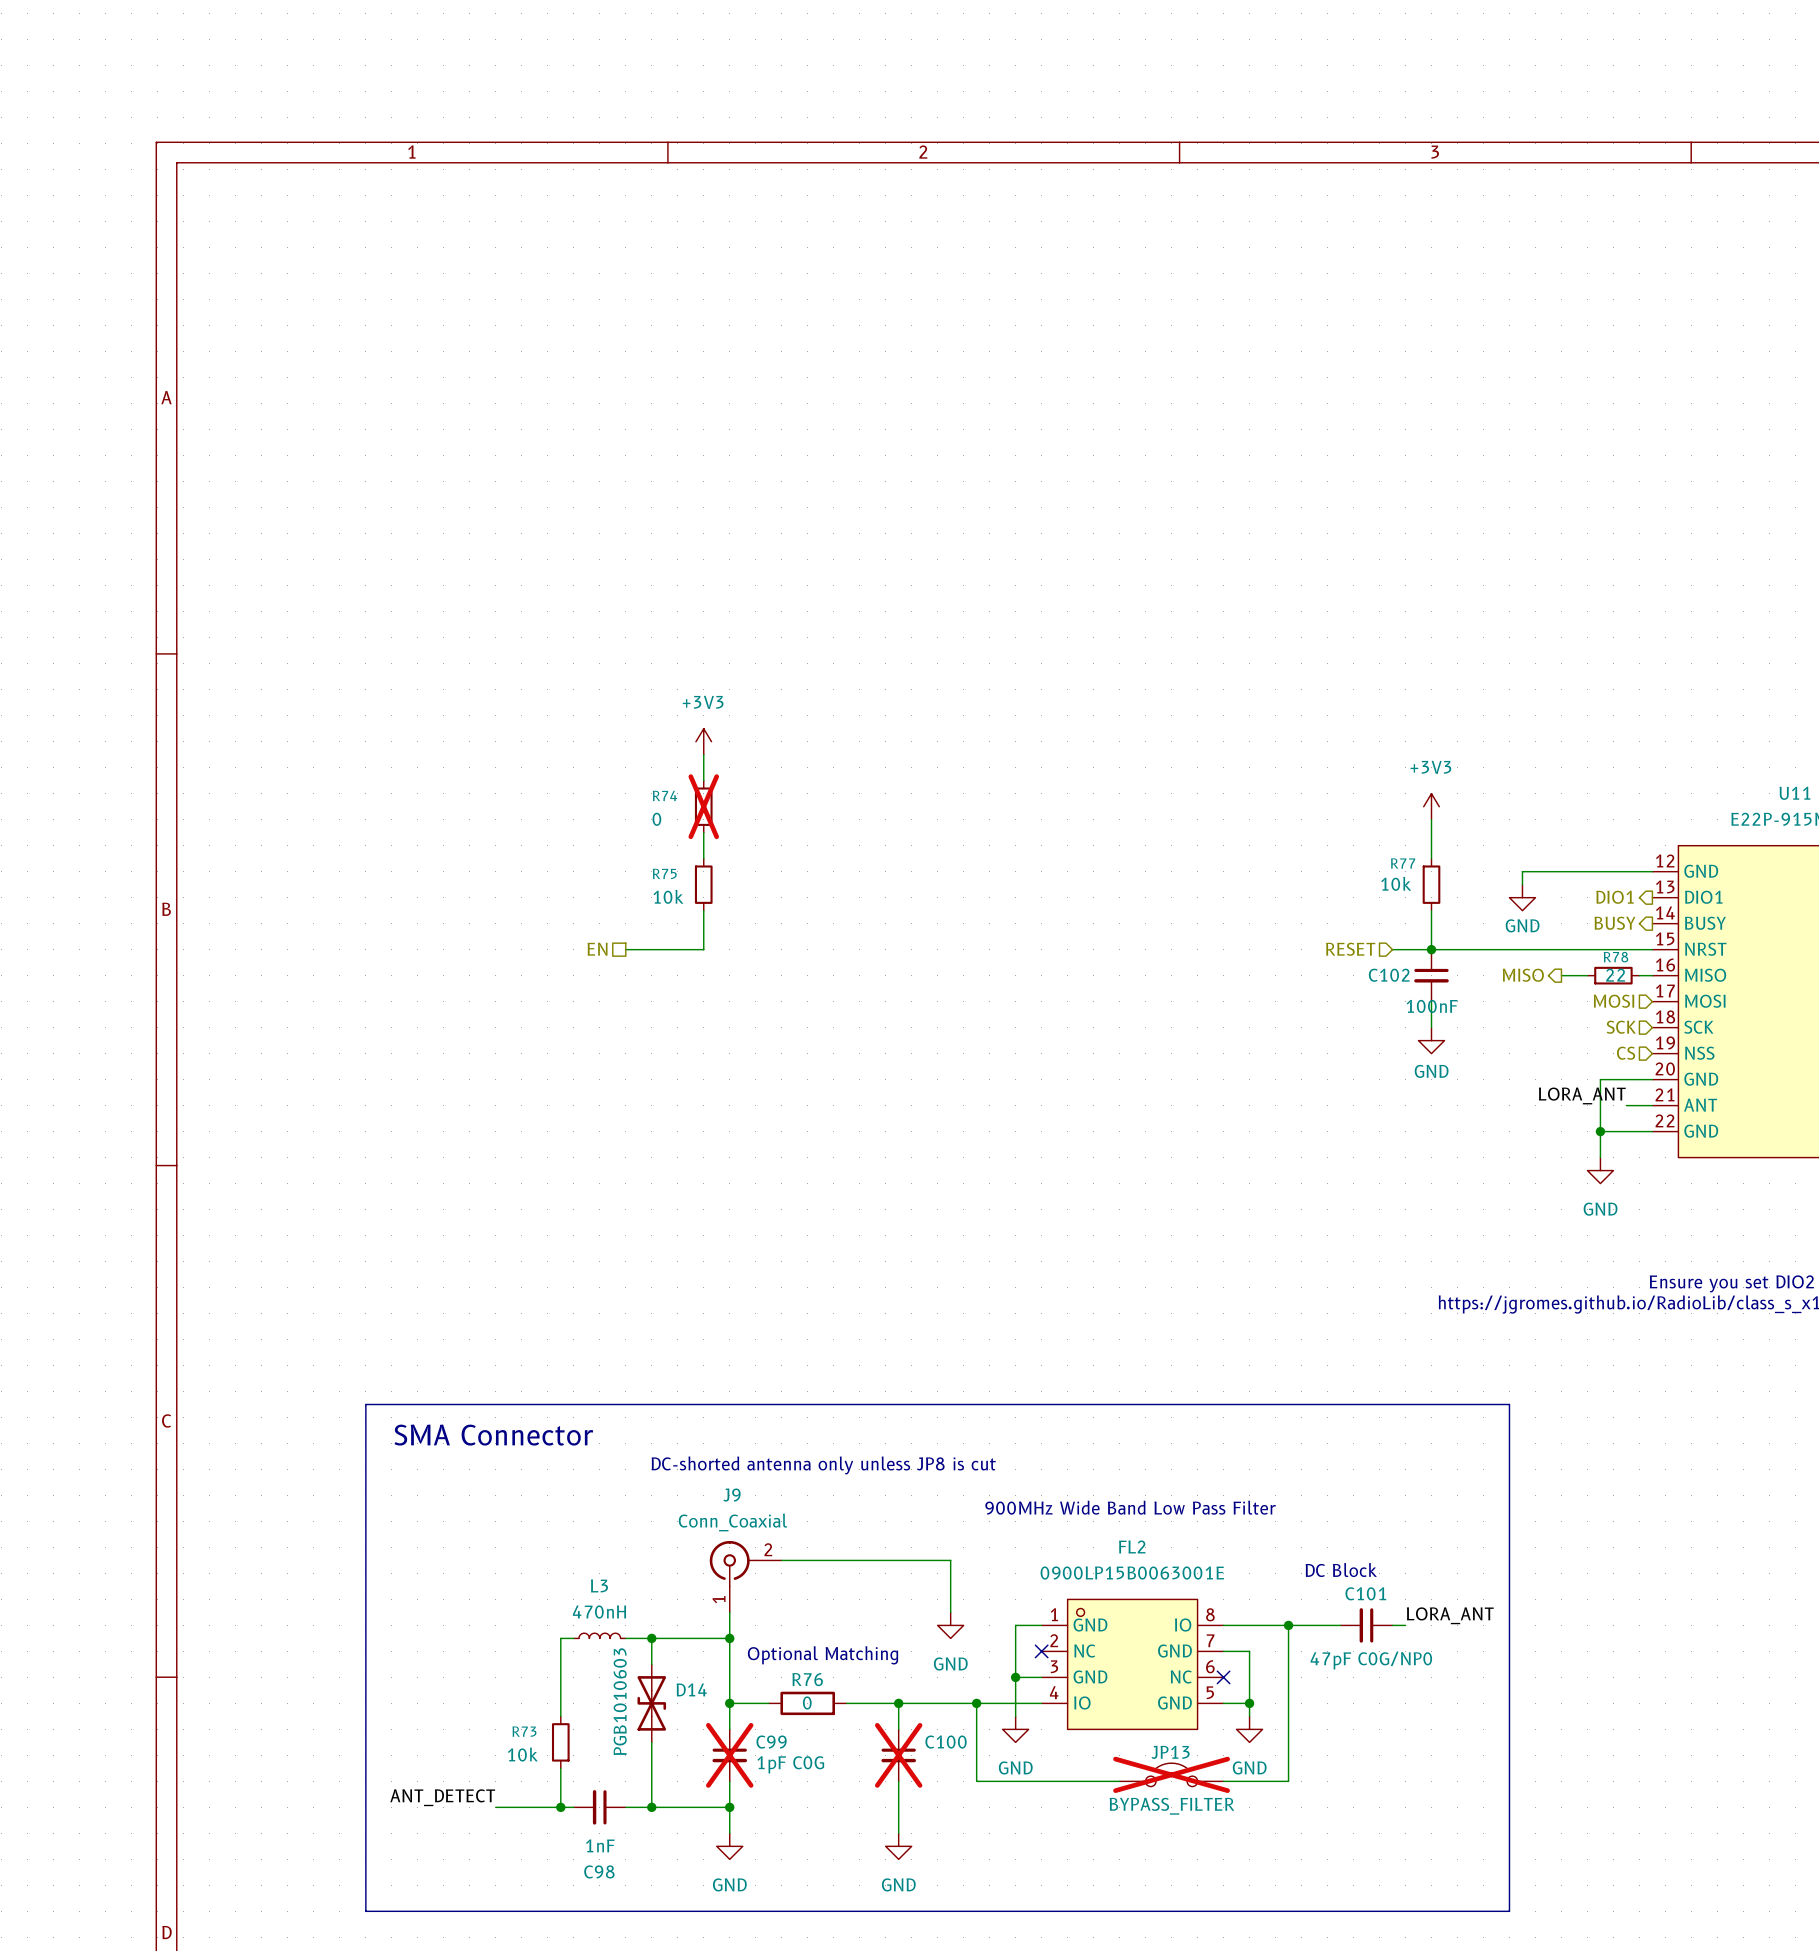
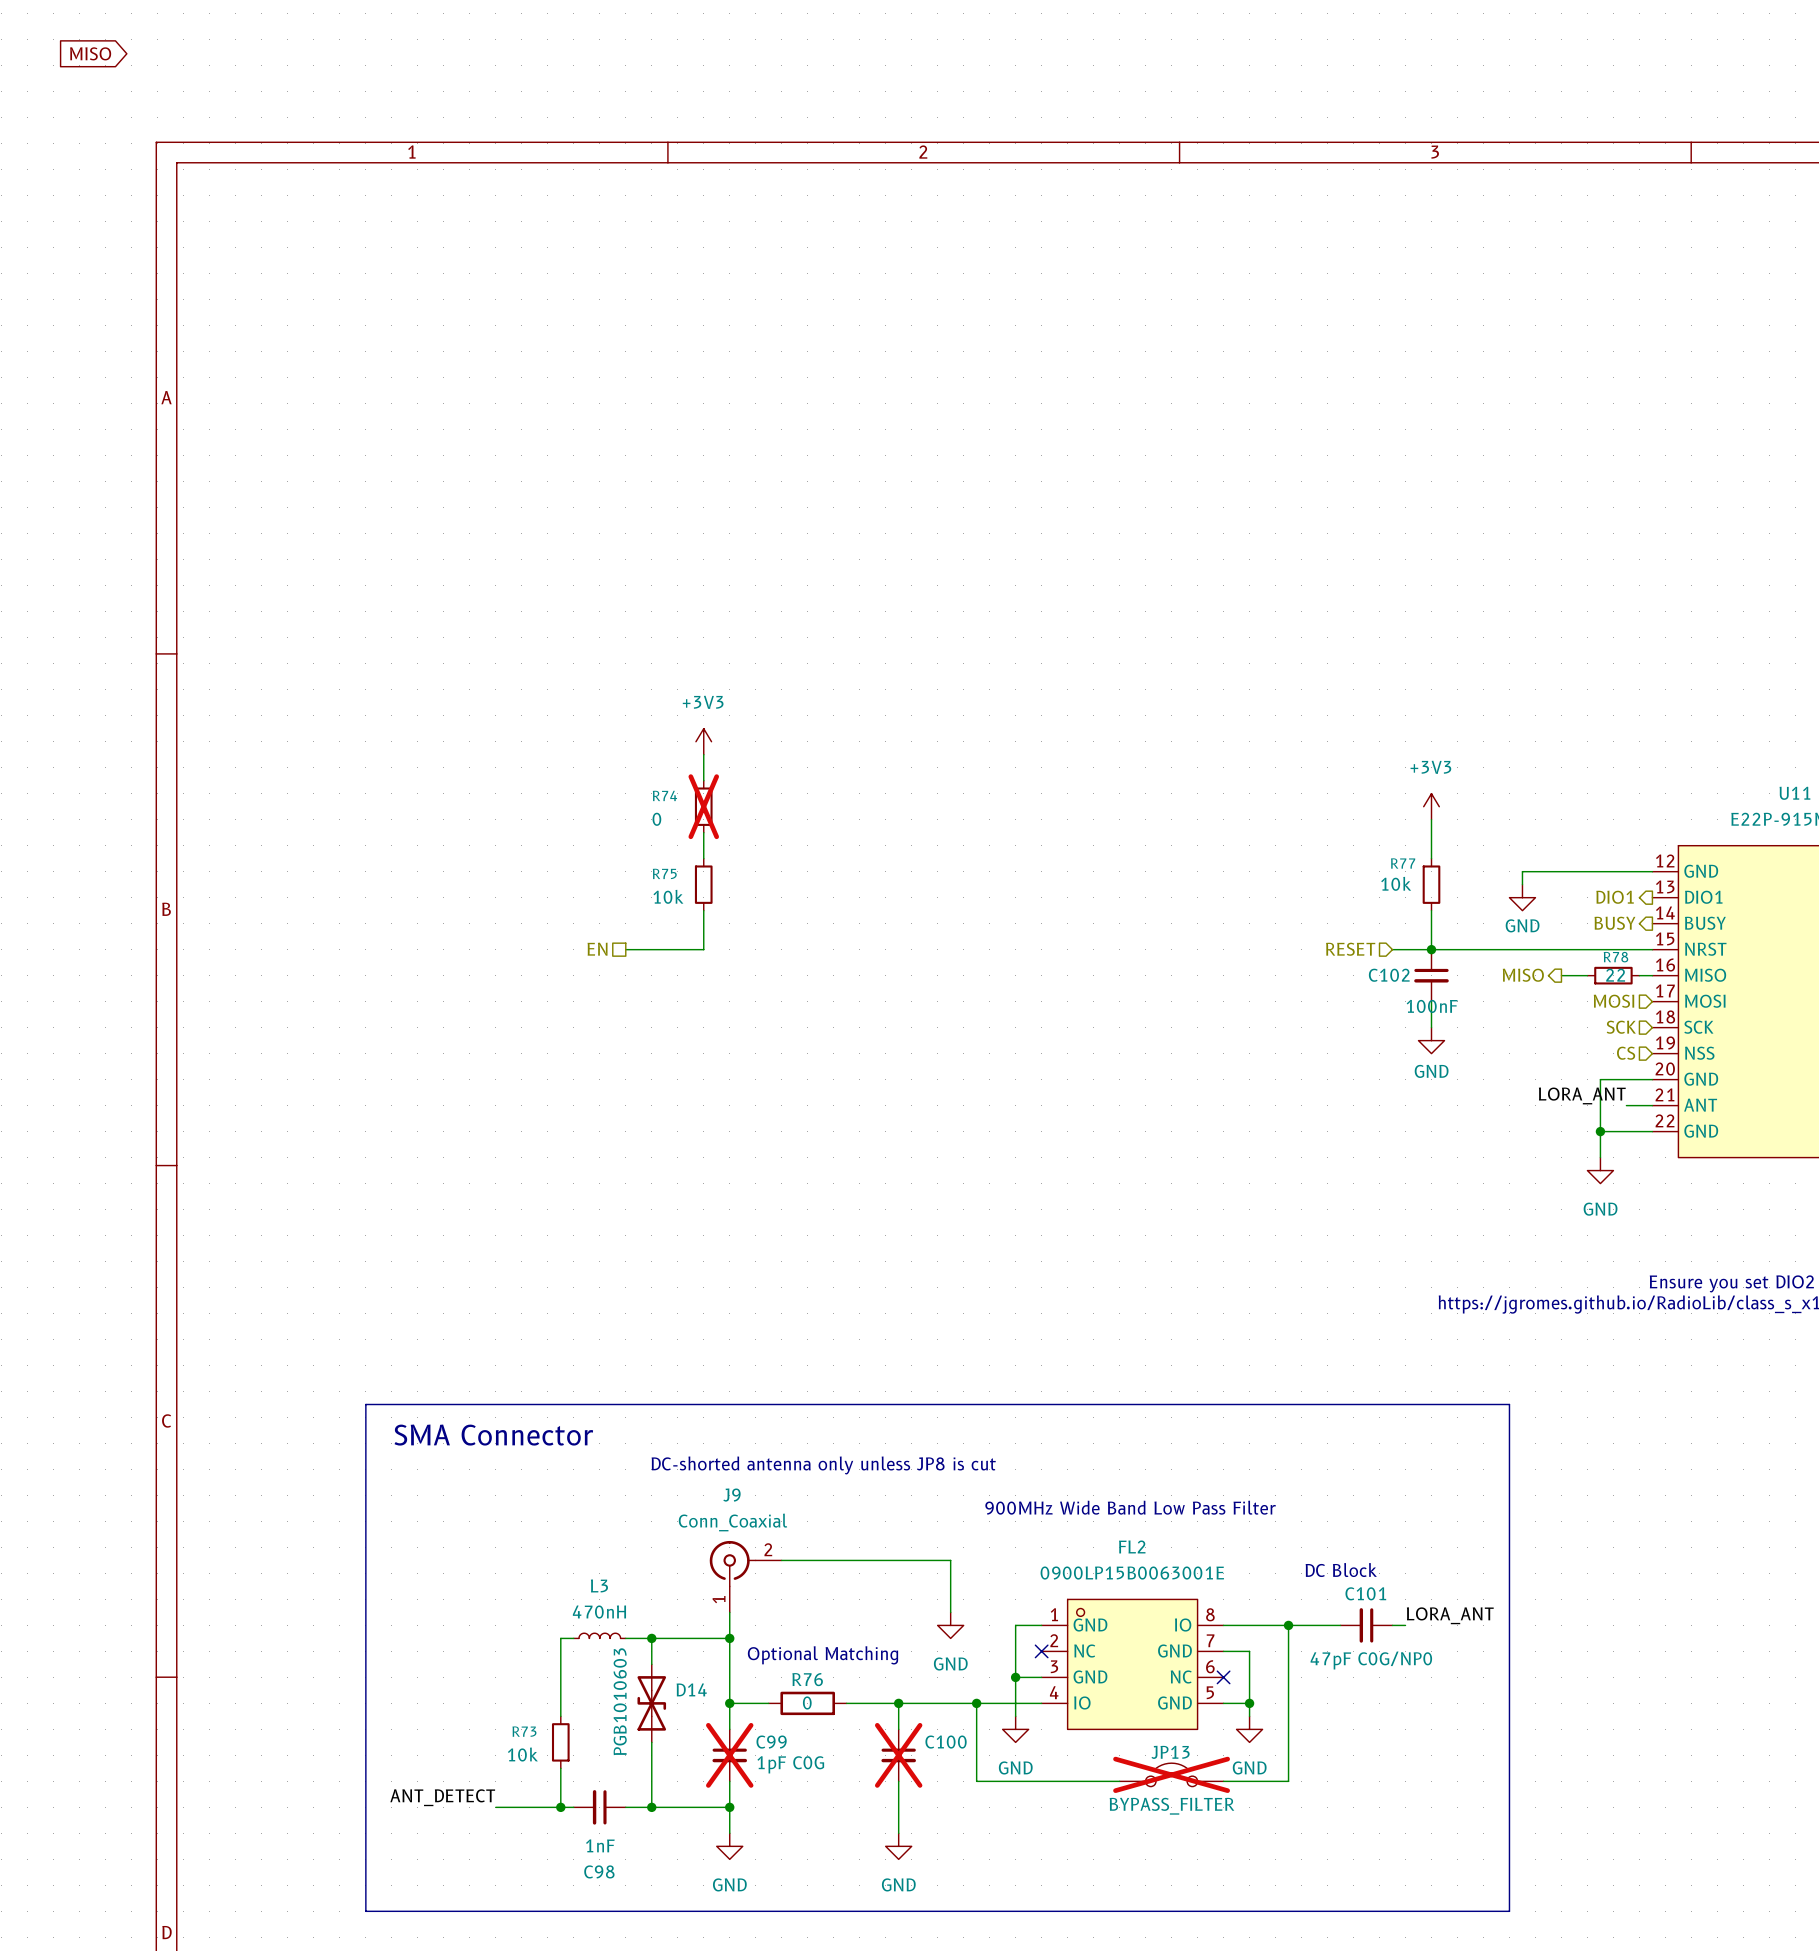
global label: none -> MISO (90, 53)

